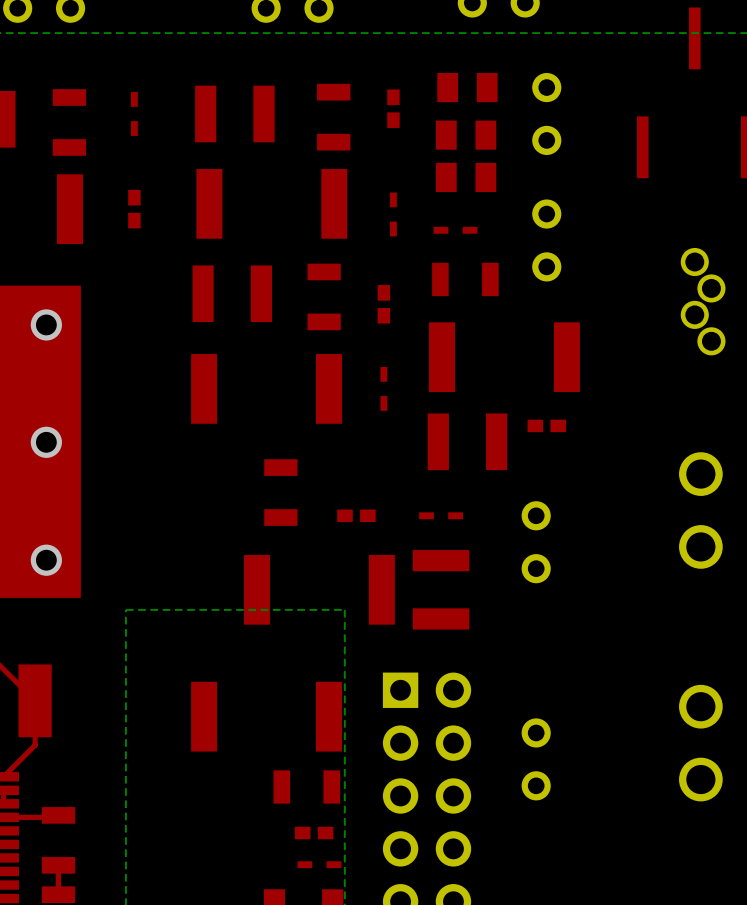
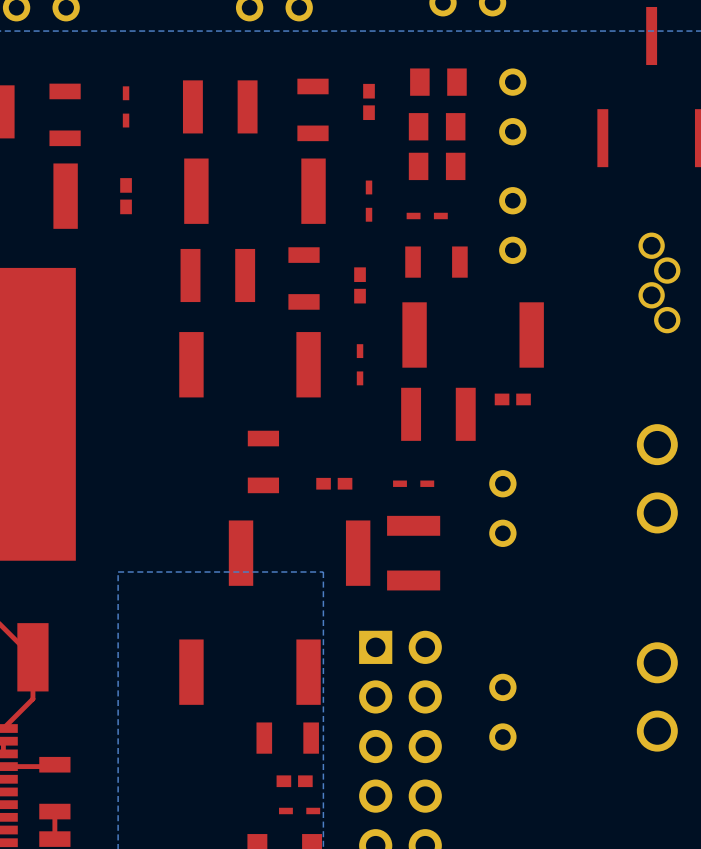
via: (46, 324) -> none
via: (46, 442) -> none
via: (46, 560) -> none

